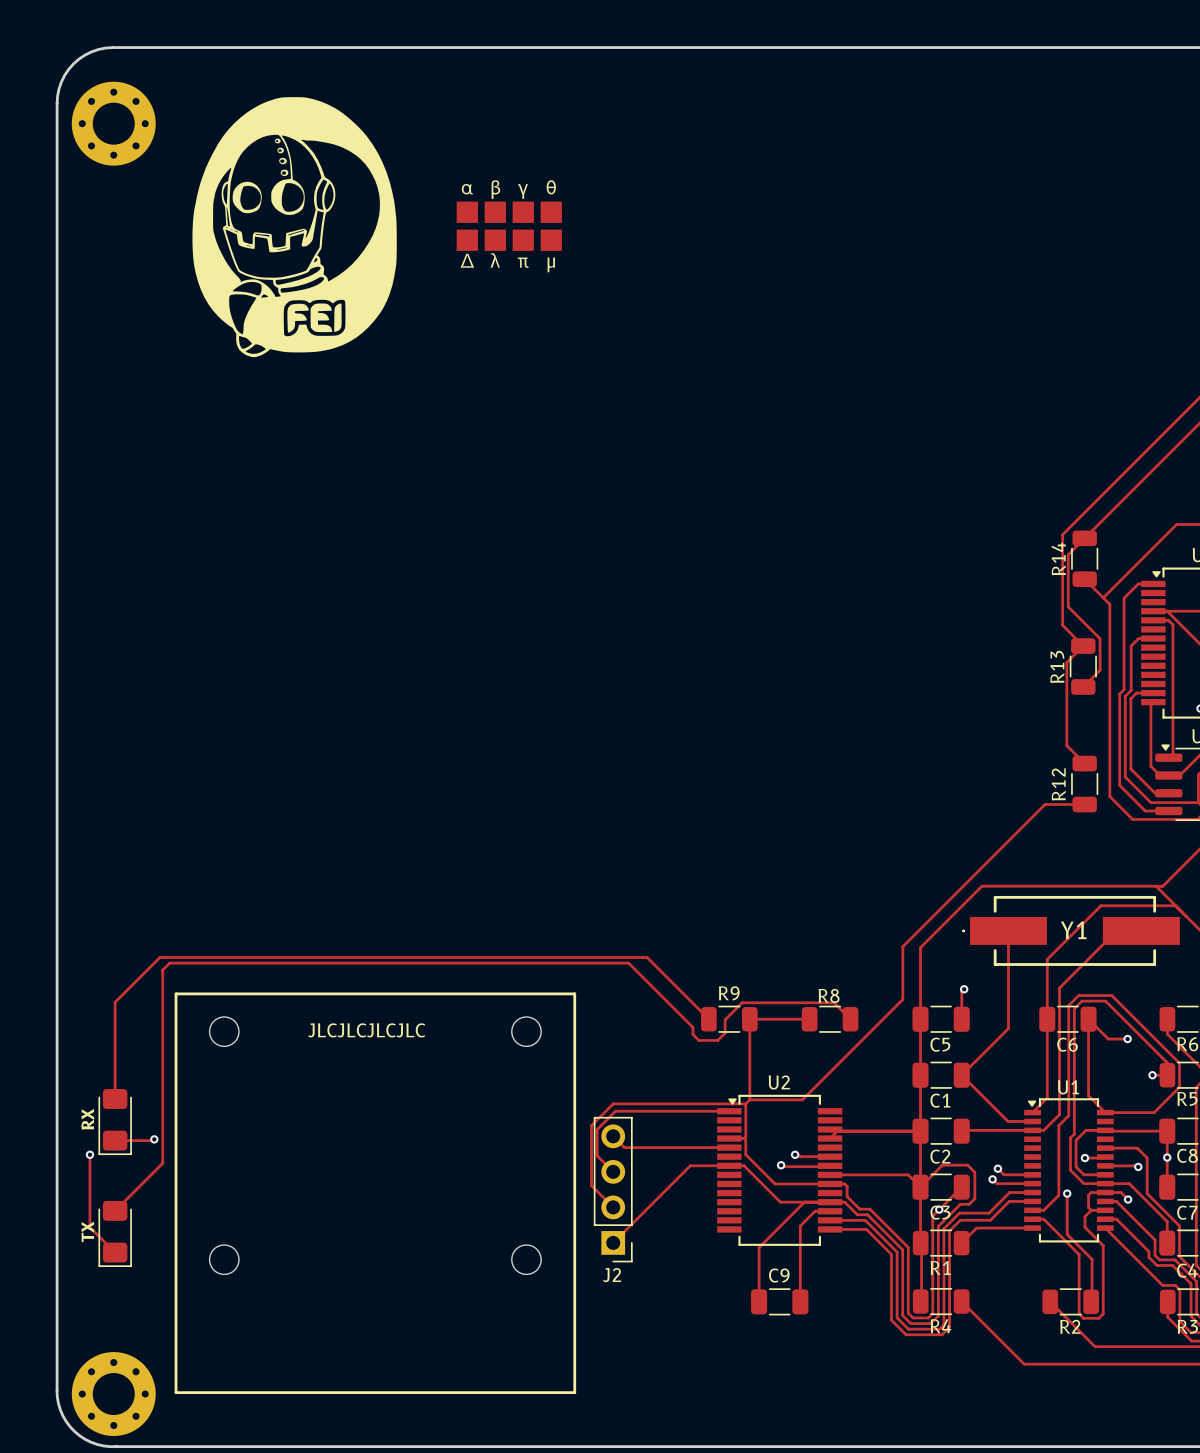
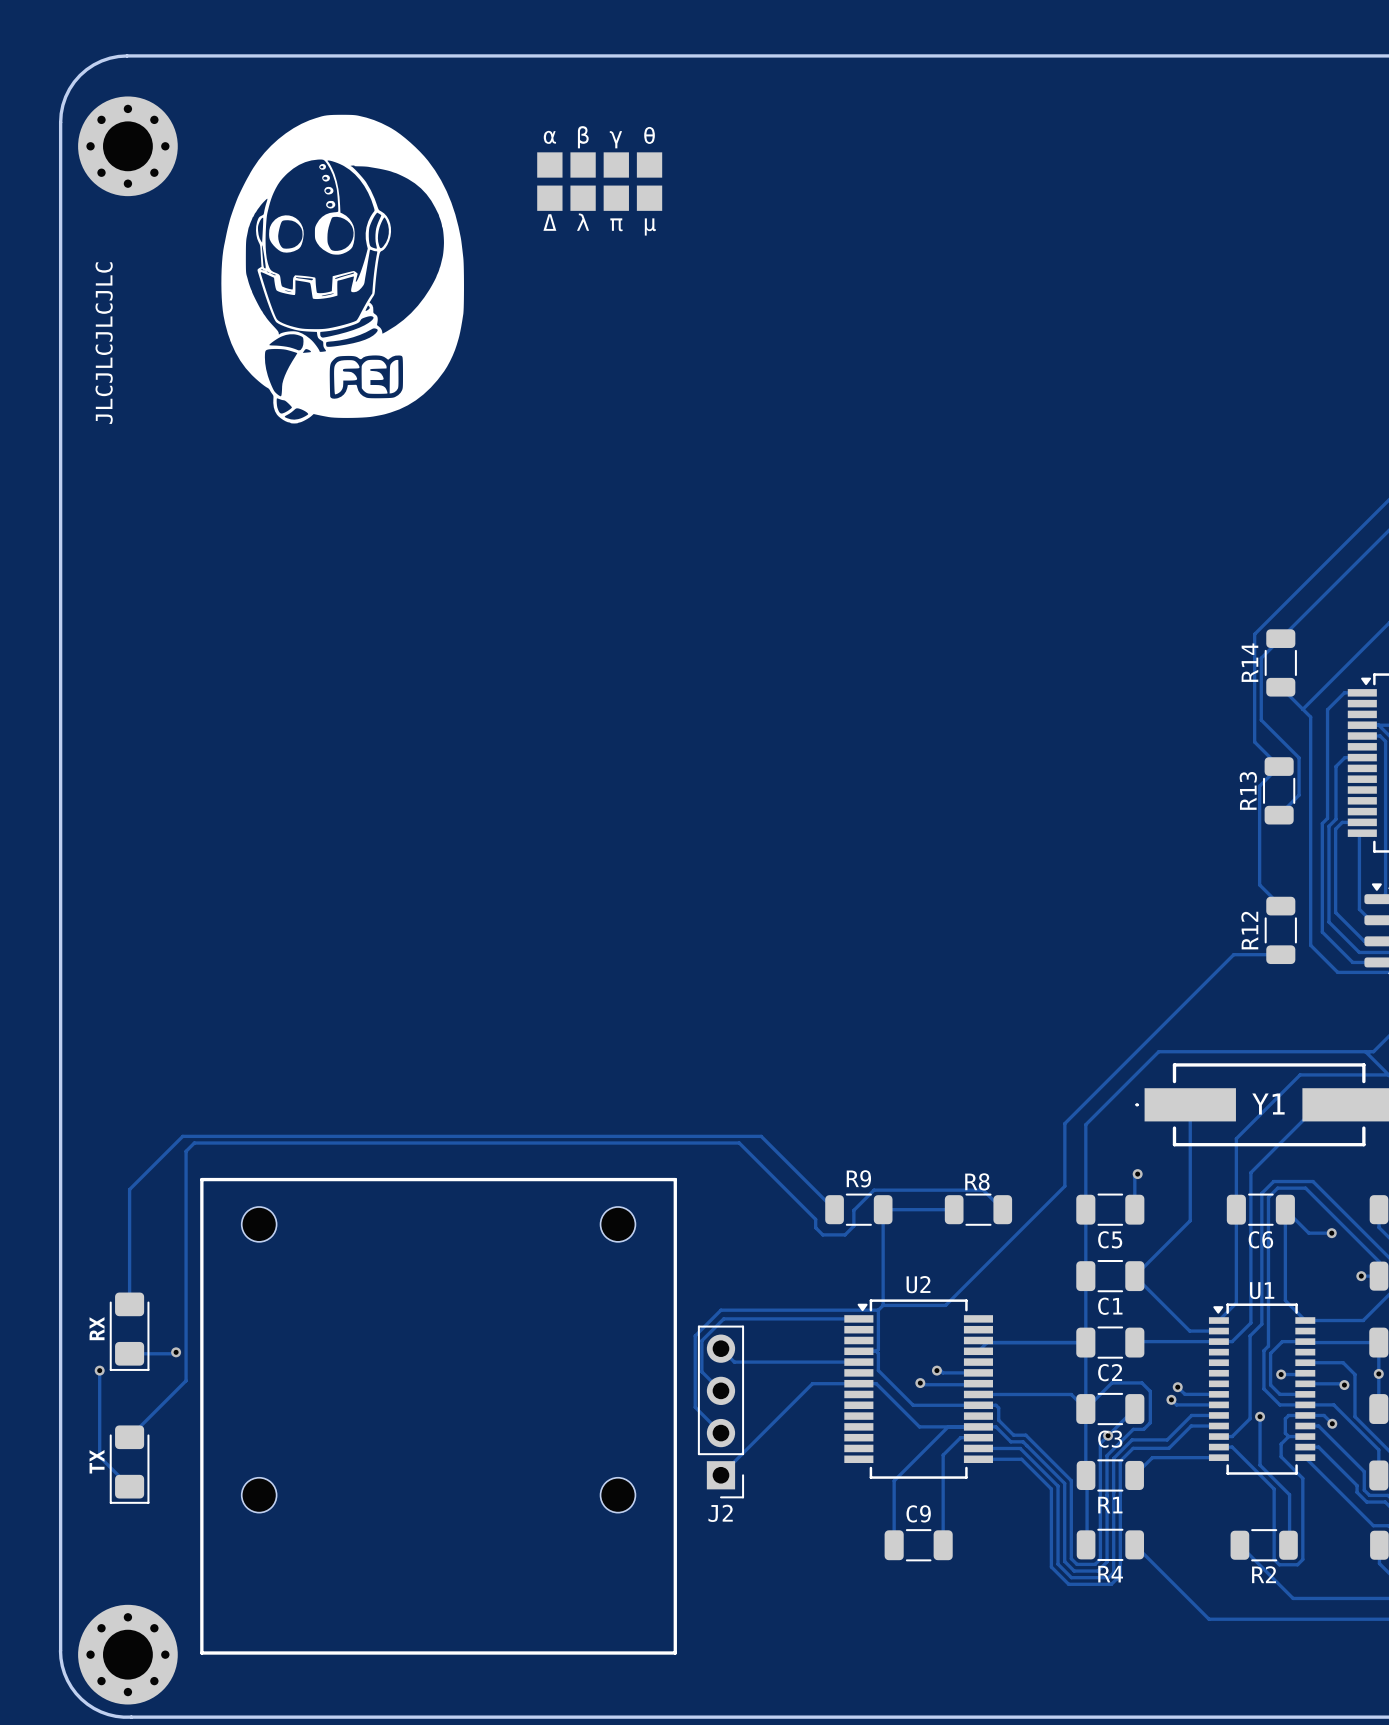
part position: (509, 226) -> (599, 181)
text: none -> JLCJLCJLCJLC (104, 343)
text: JLCJLCJLCJLC (366, 1030) -> none

